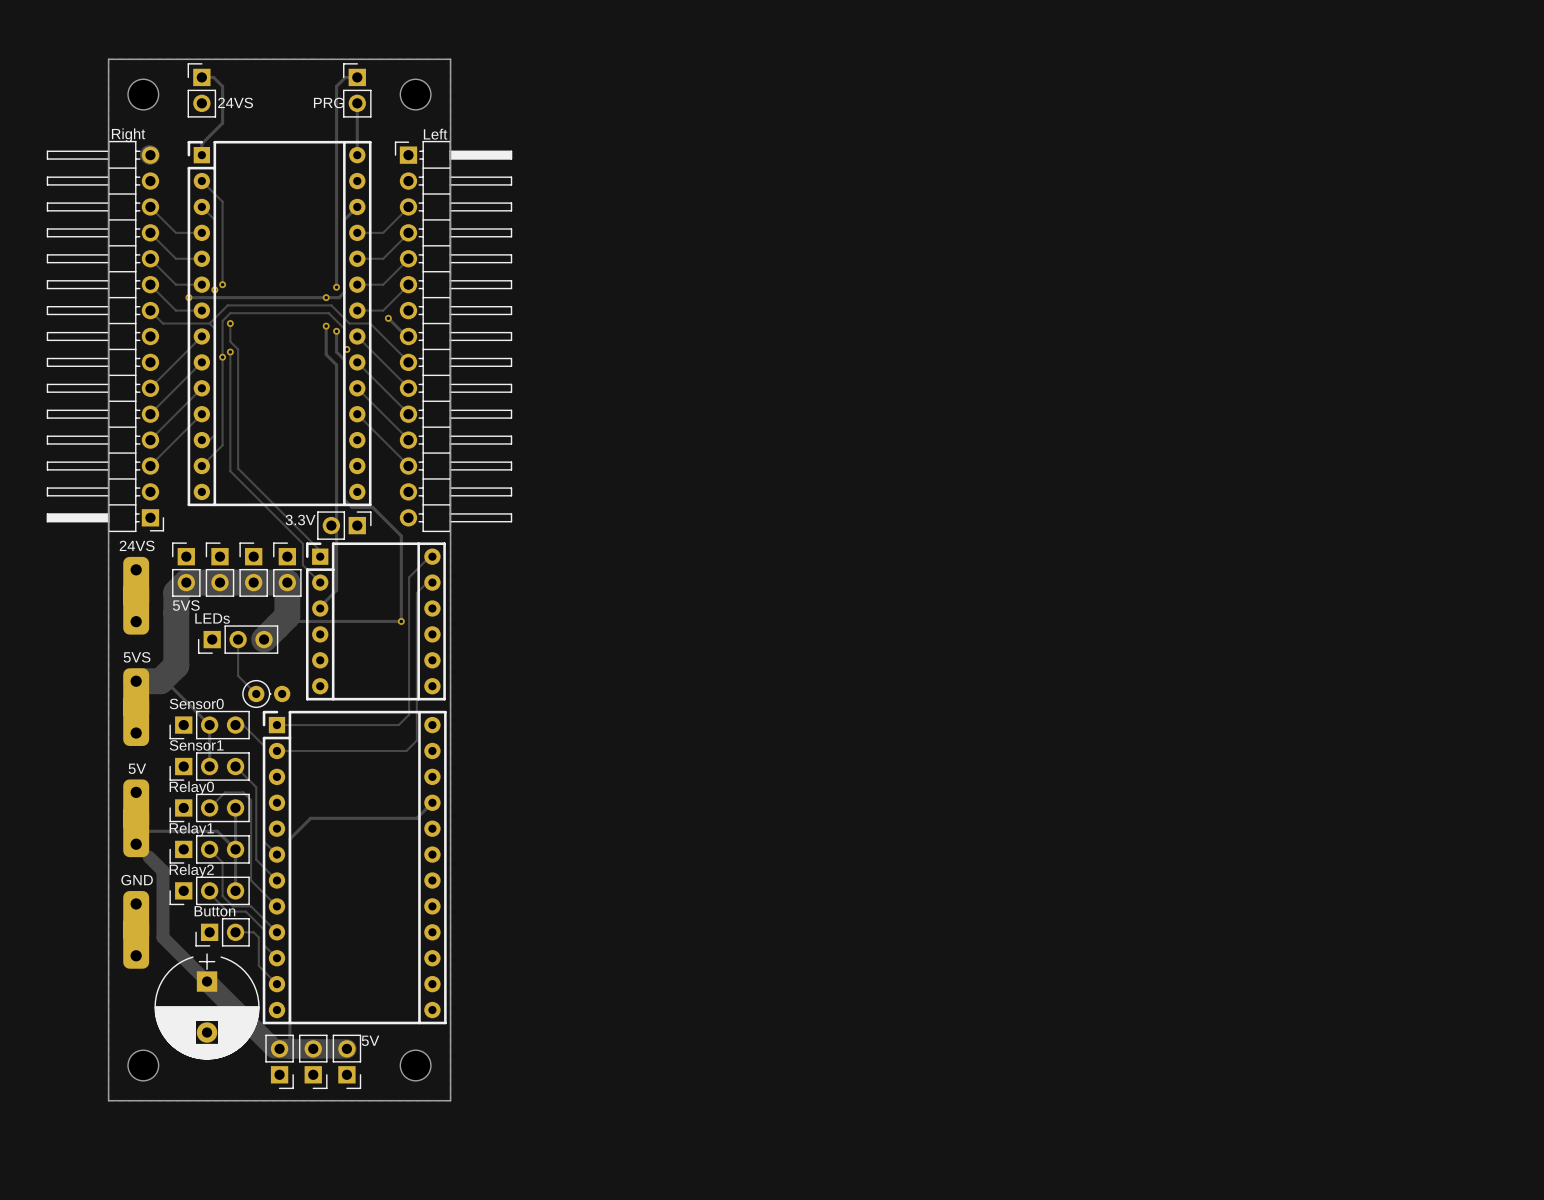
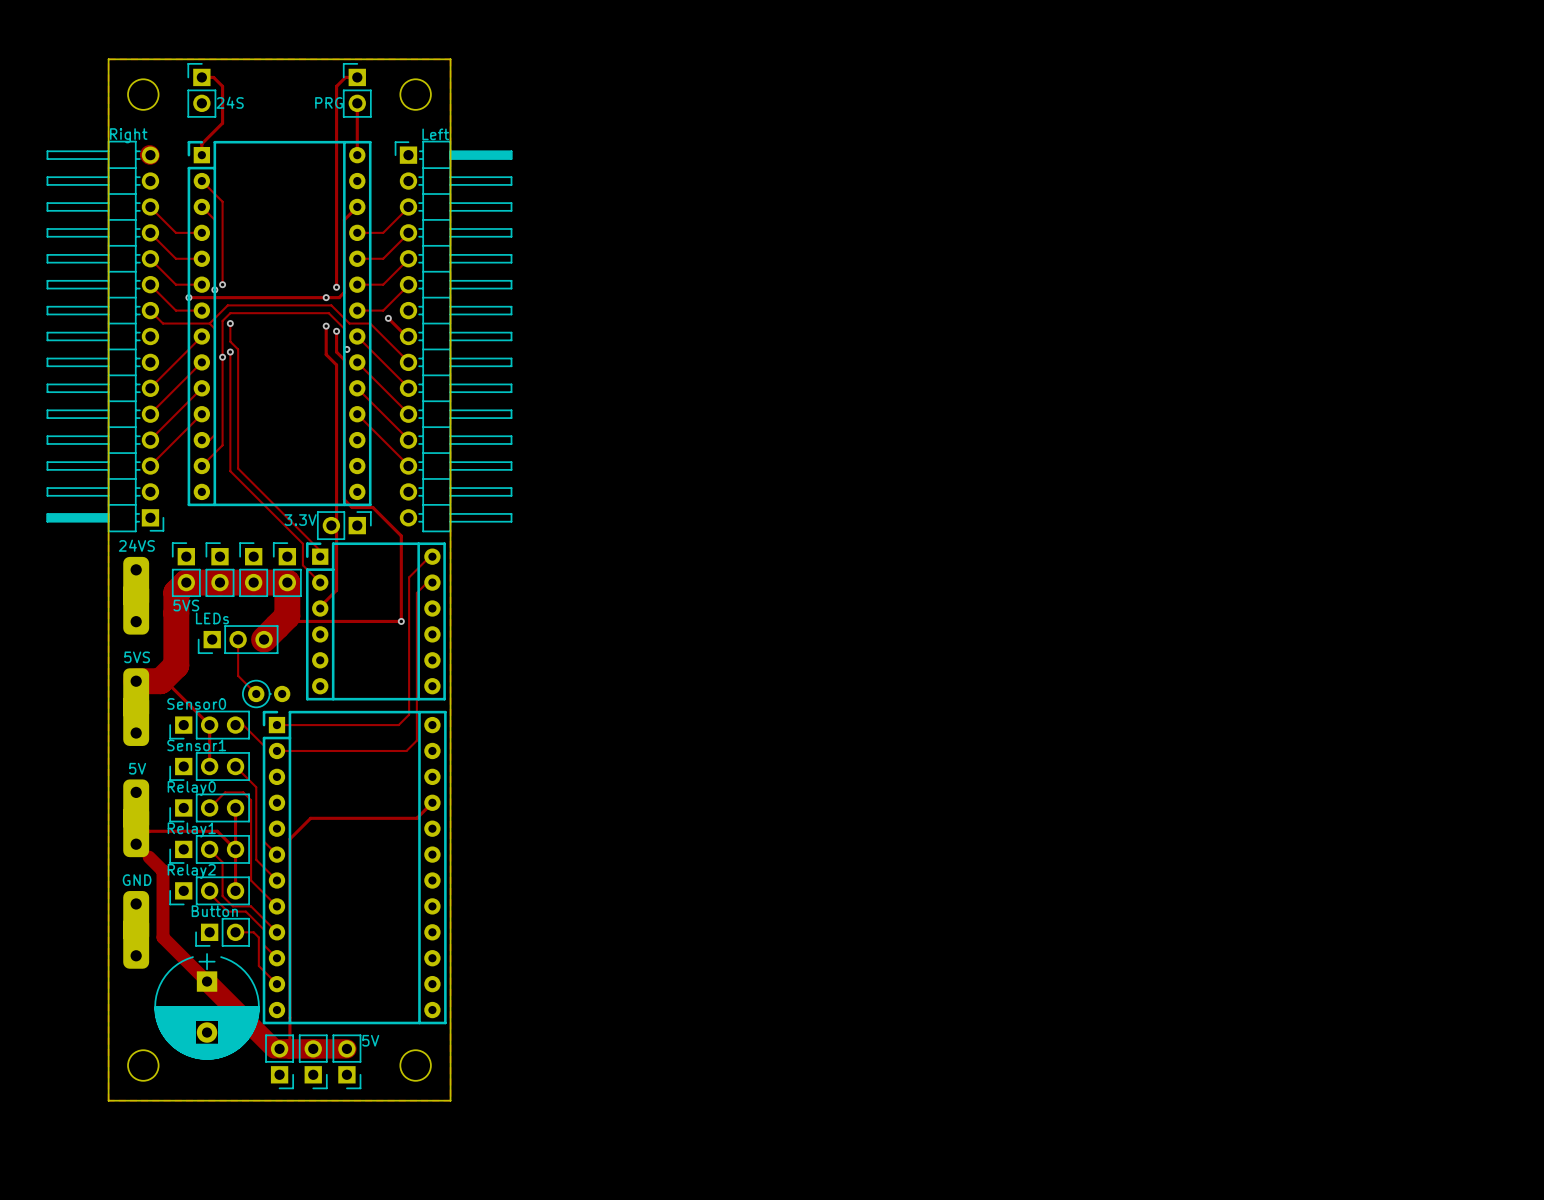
part value: 24VS (235, 102) -> 24S (230, 102)

